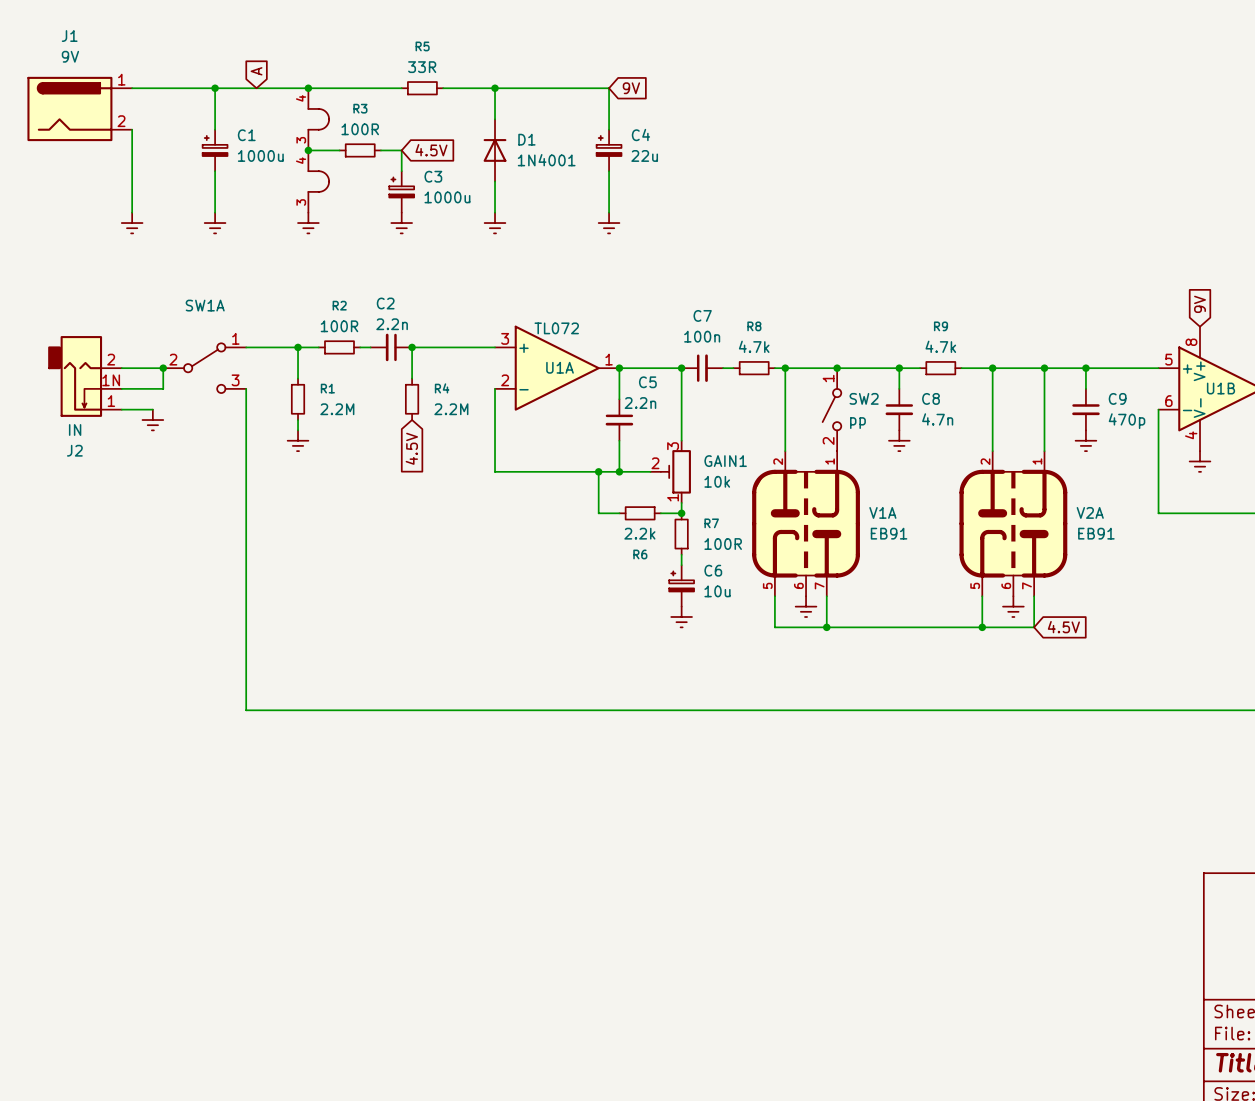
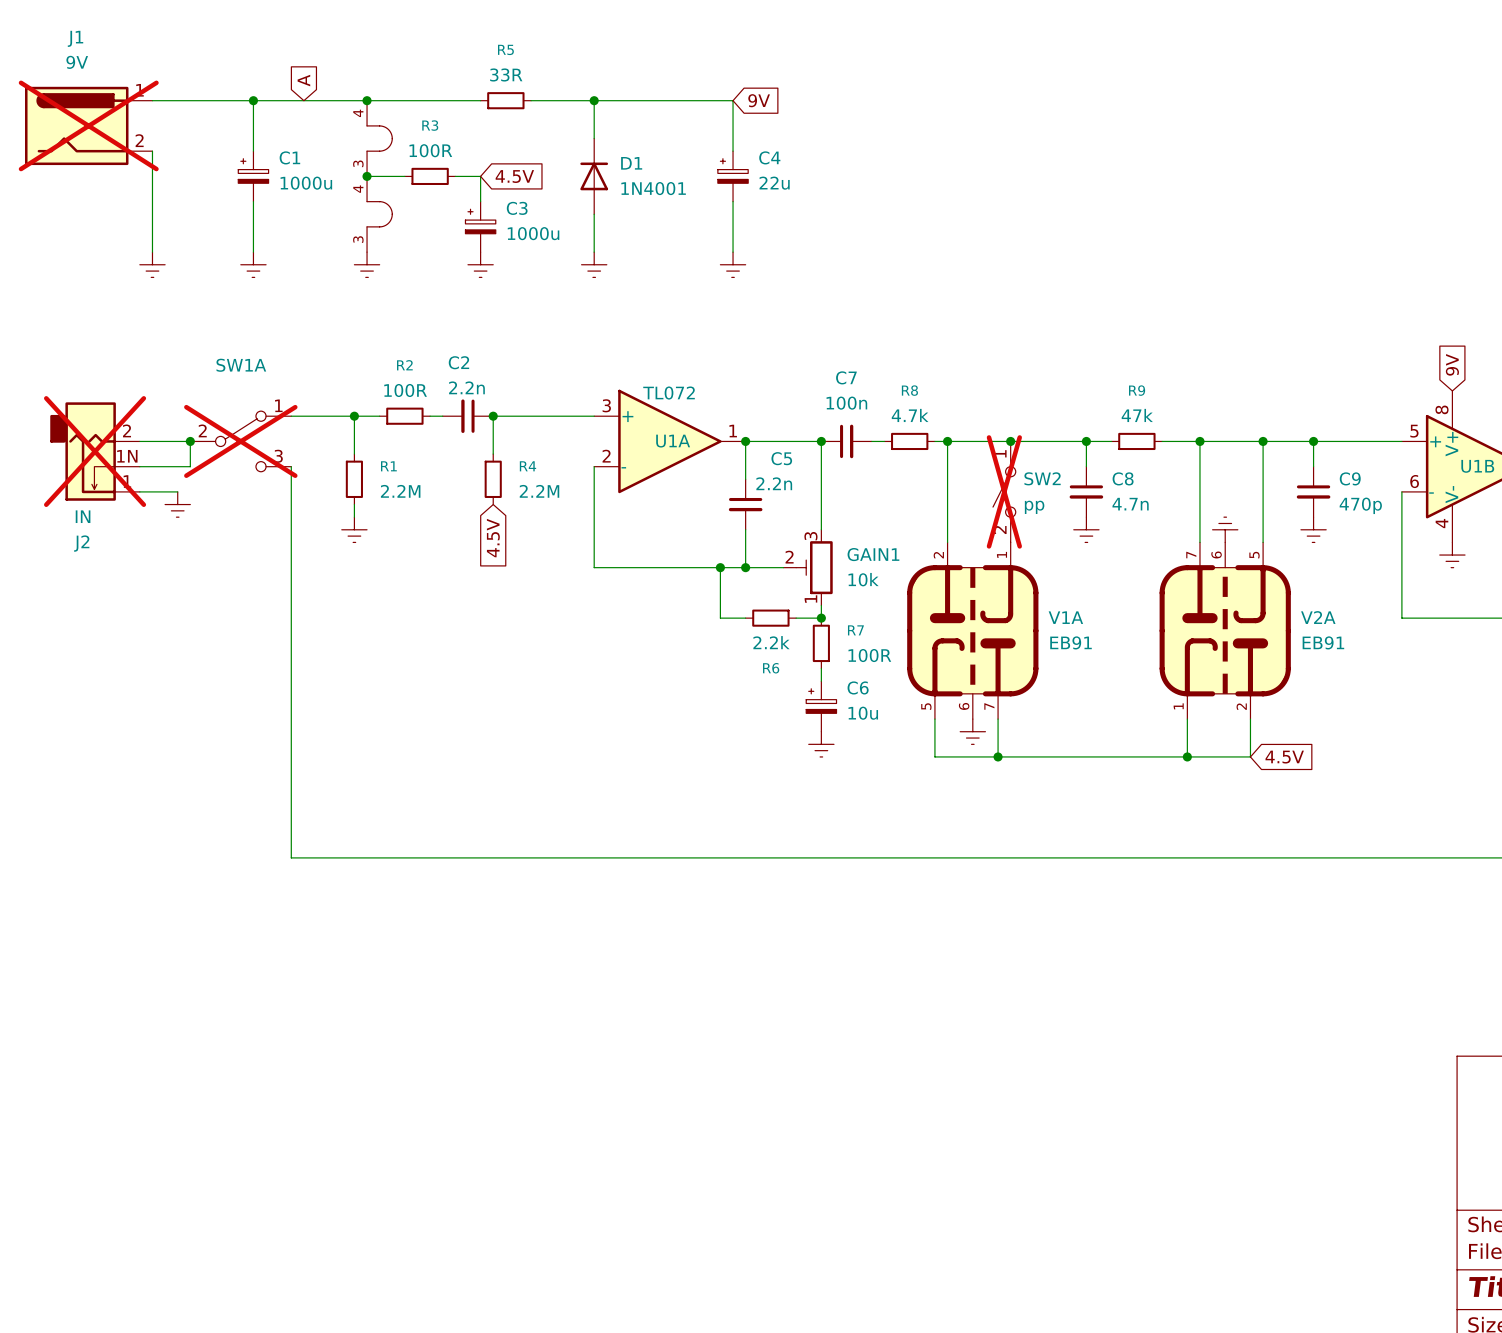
J1 do-not-place cross: none -> (88, 125)
R9 value: 4.7k (940, 346) -> 47k (1137, 415)
SW1A do-not-place cross: none -> (240, 441)
J2 do-not-place cross: none -> (95, 451)
SW2 do-not-place cross: none -> (1004, 491)
V2A rotation: 0° (1013, 523) -> 180° (1225, 630)
power symbol rotation: 0° (1013, 606) -> 180° (1225, 529)
power symbol position: (1013, 606) -> (1225, 529)

